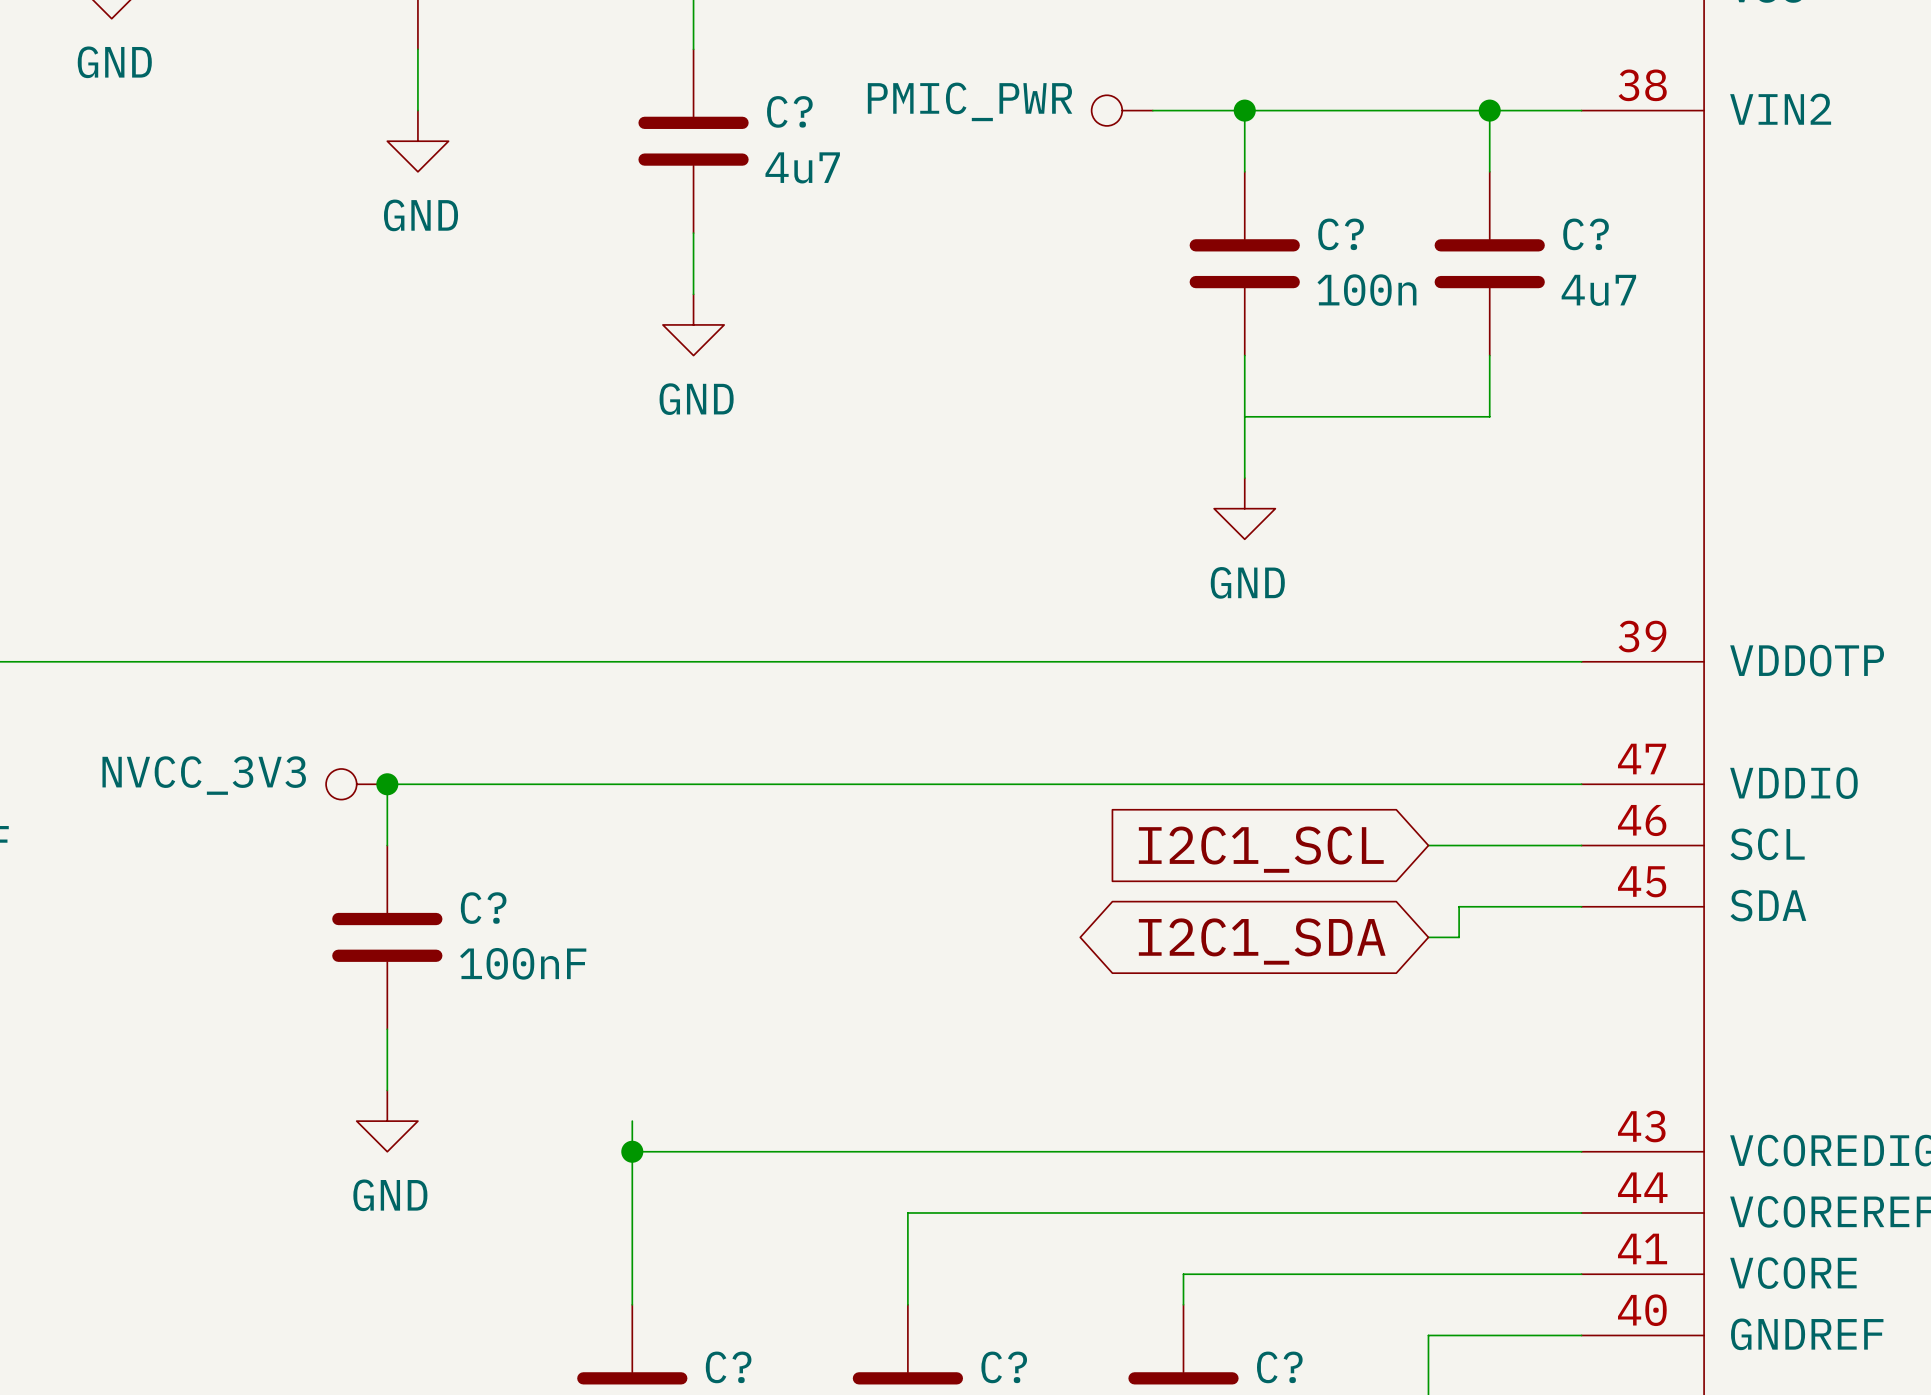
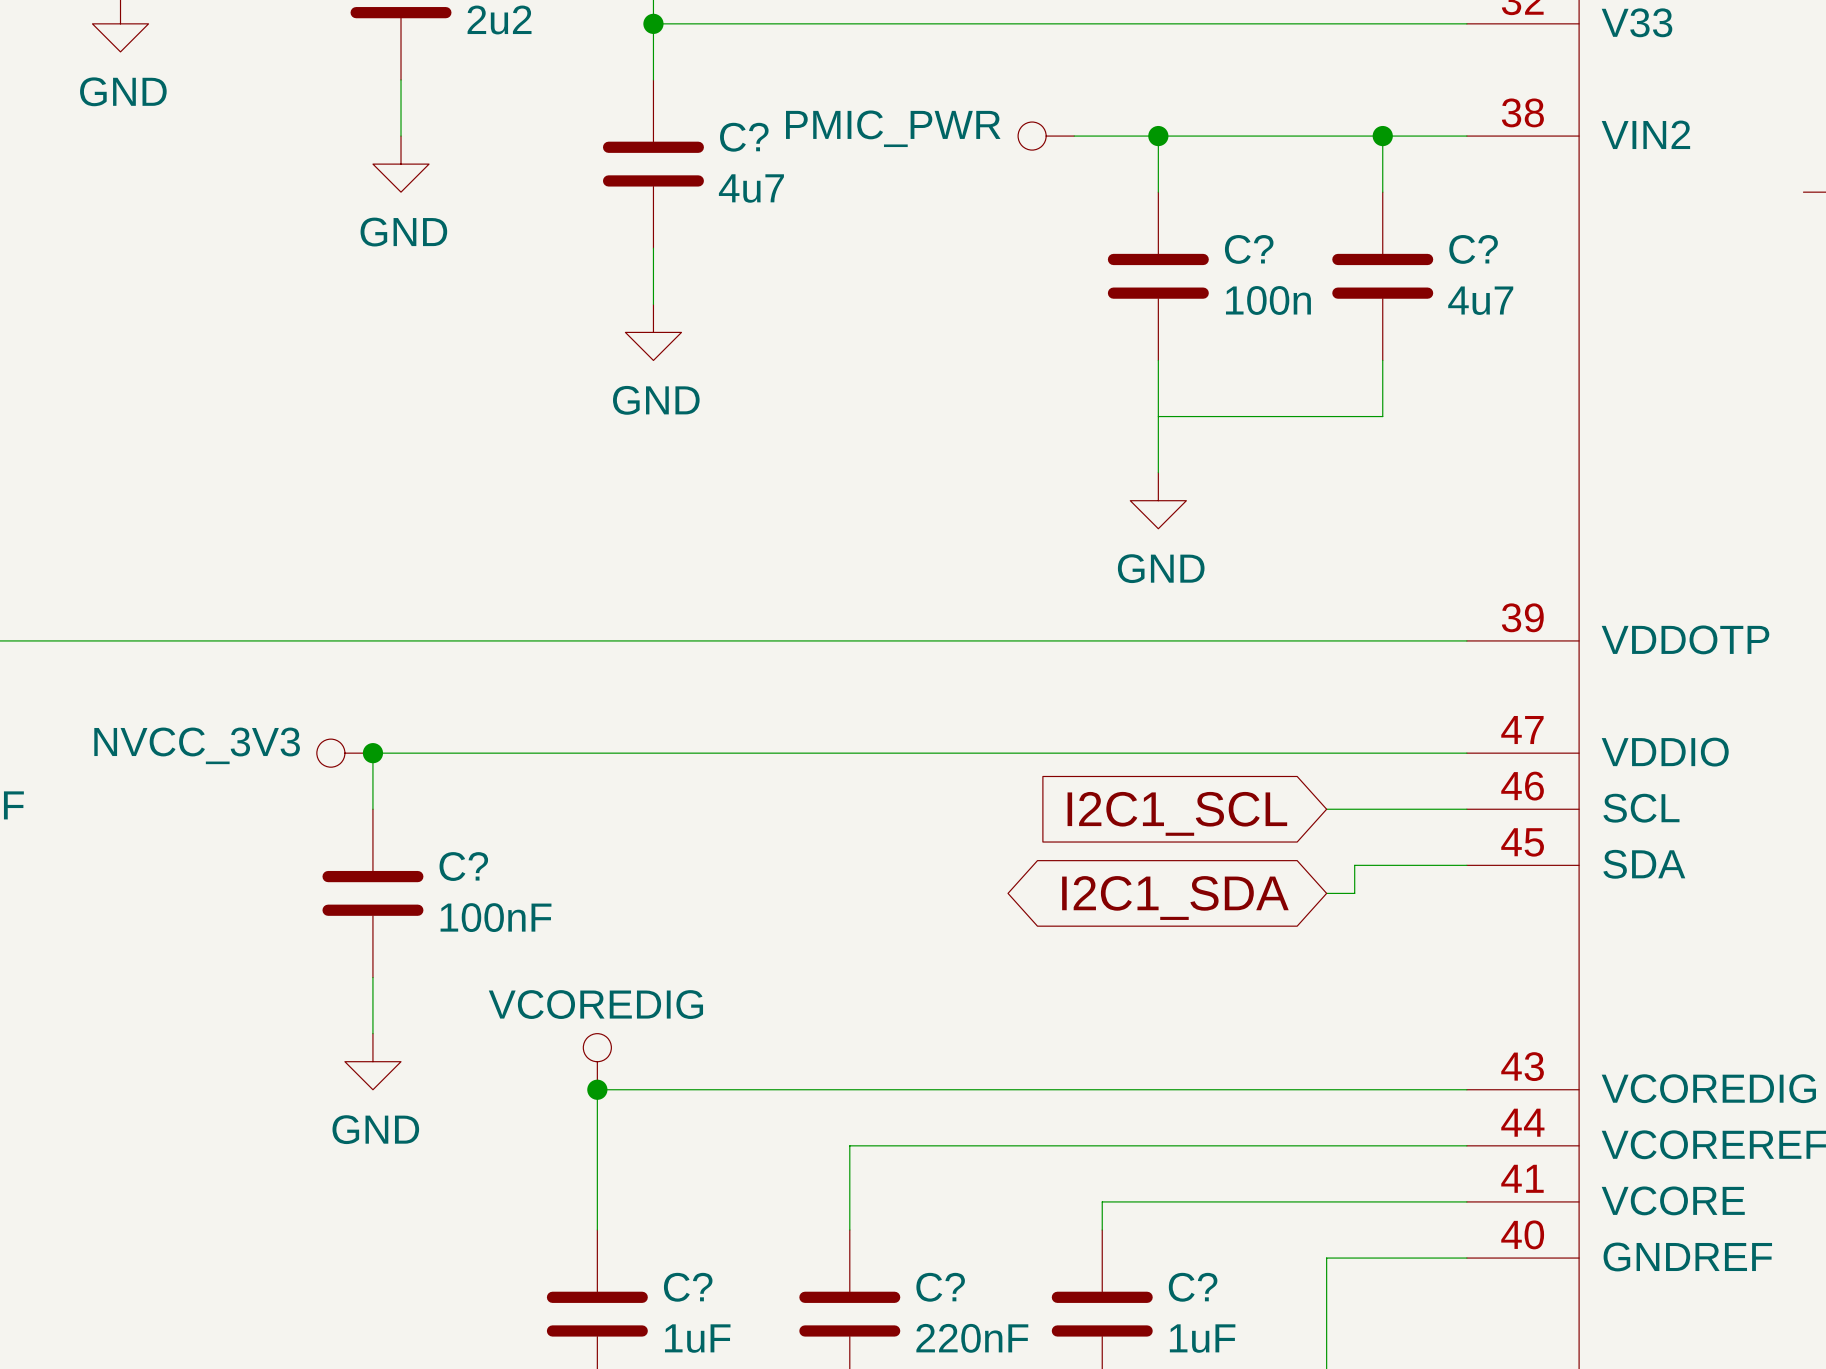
power symbol: none -> VCOREDIG (597, 1061)

